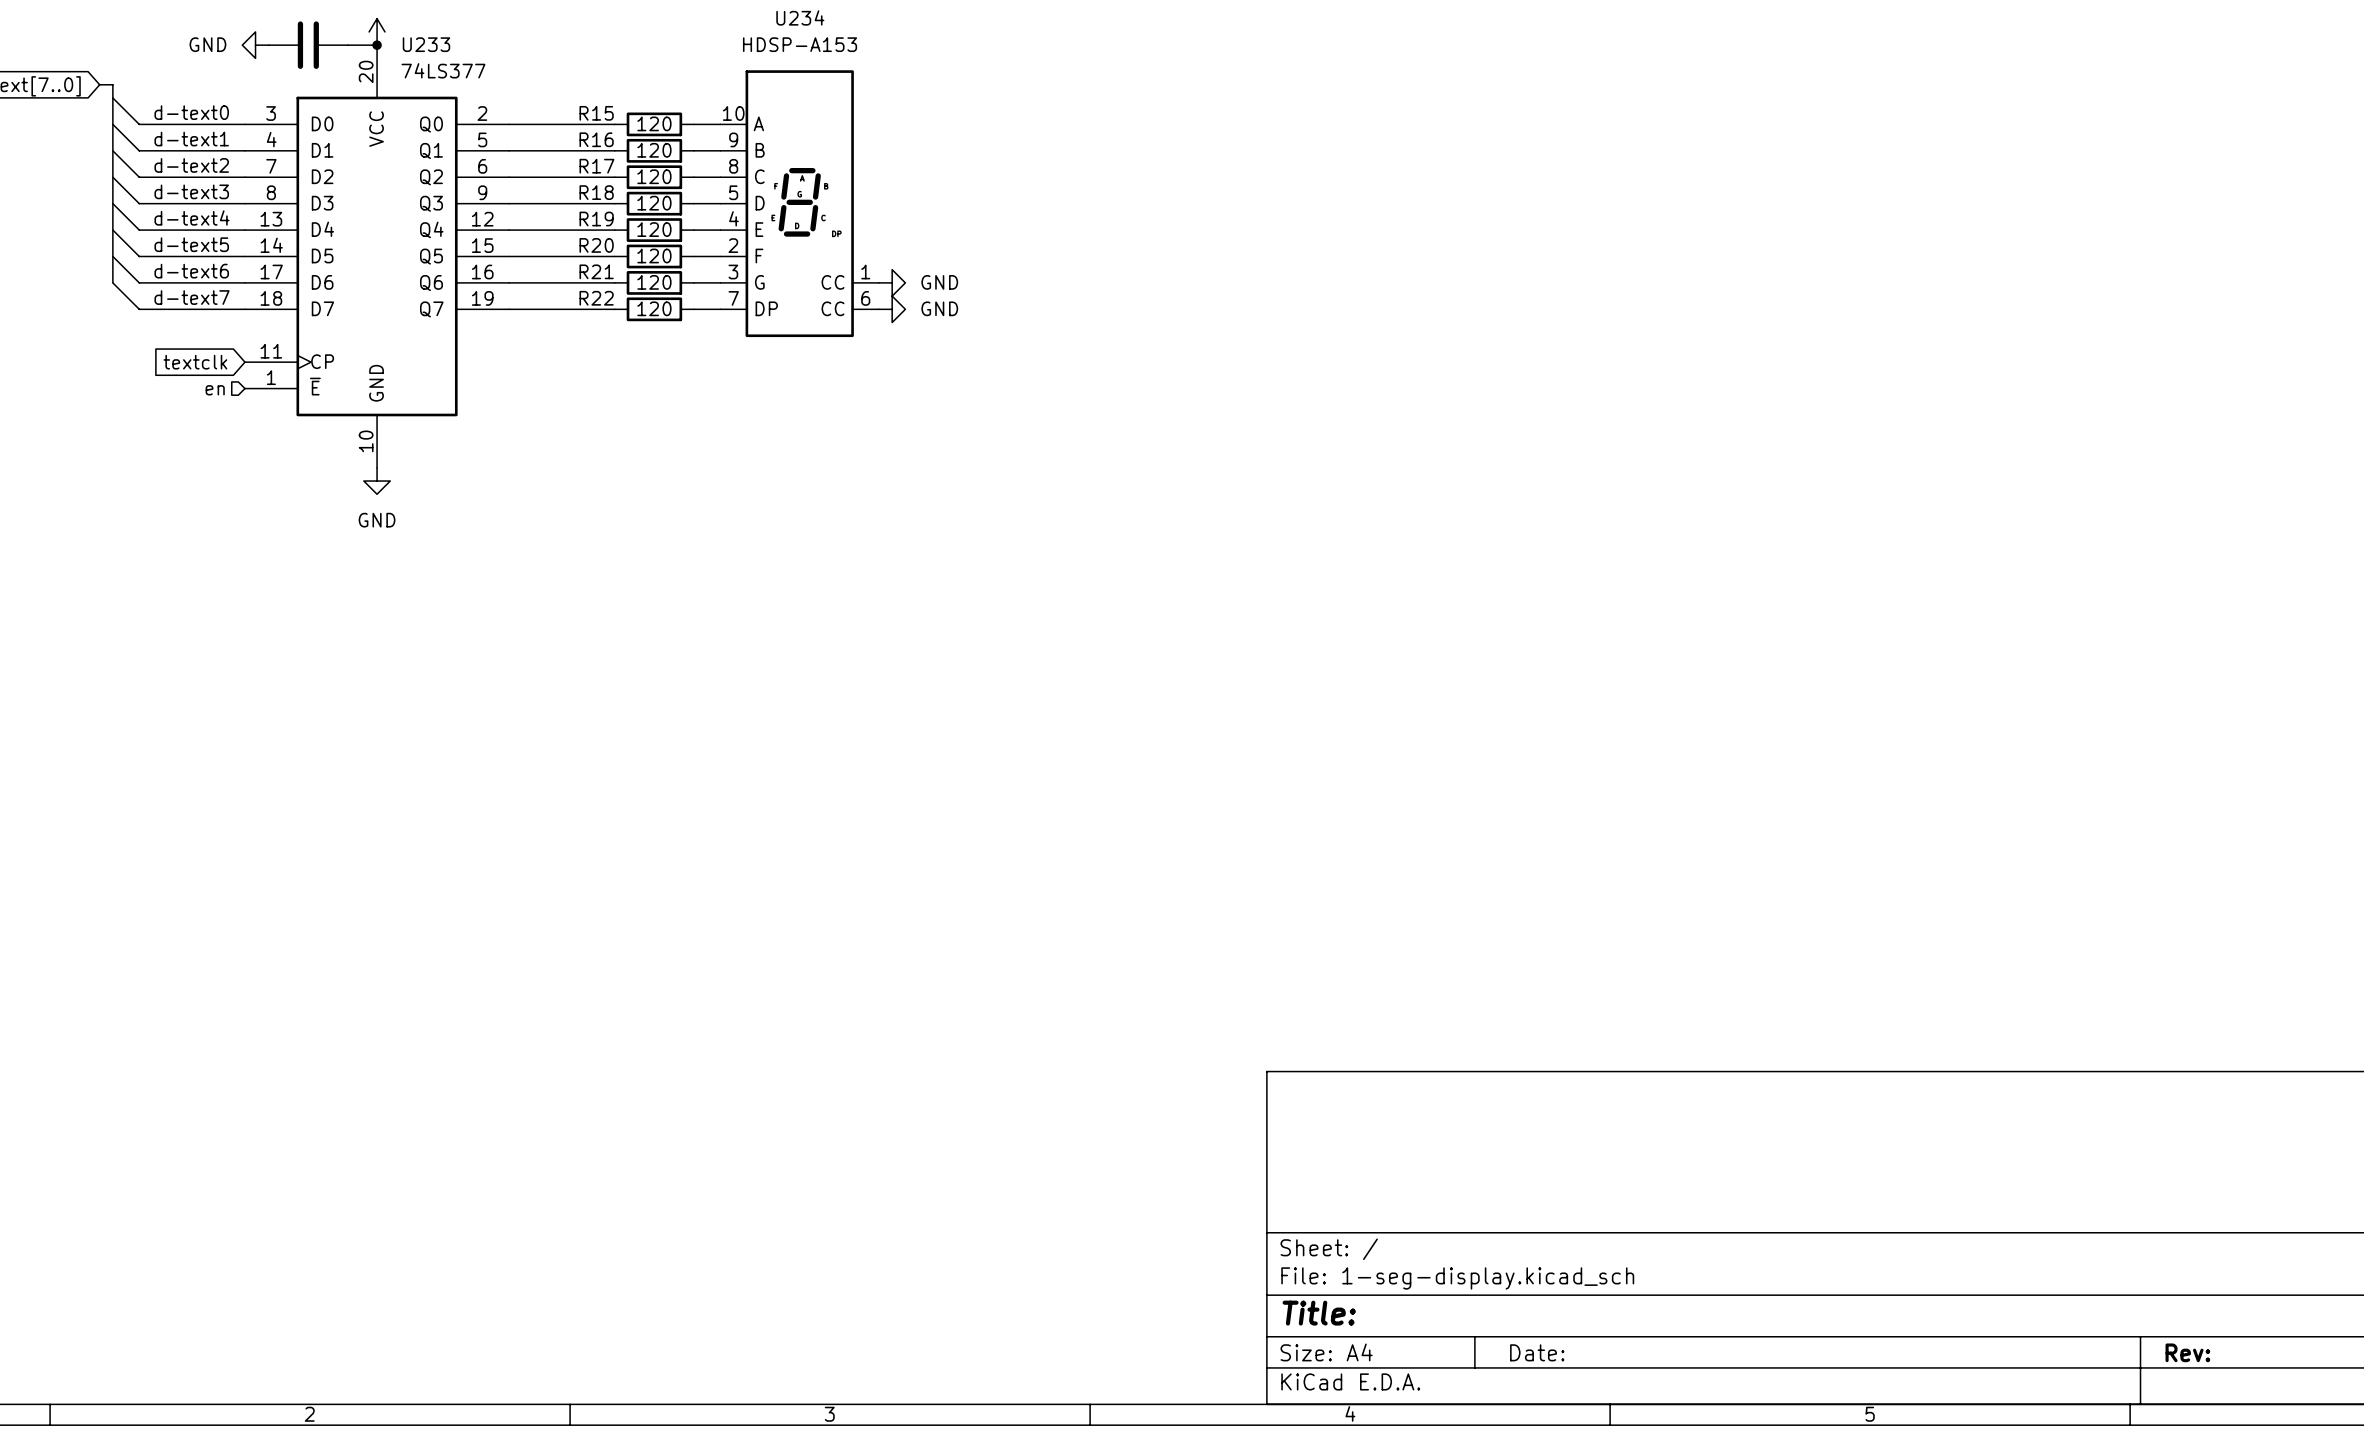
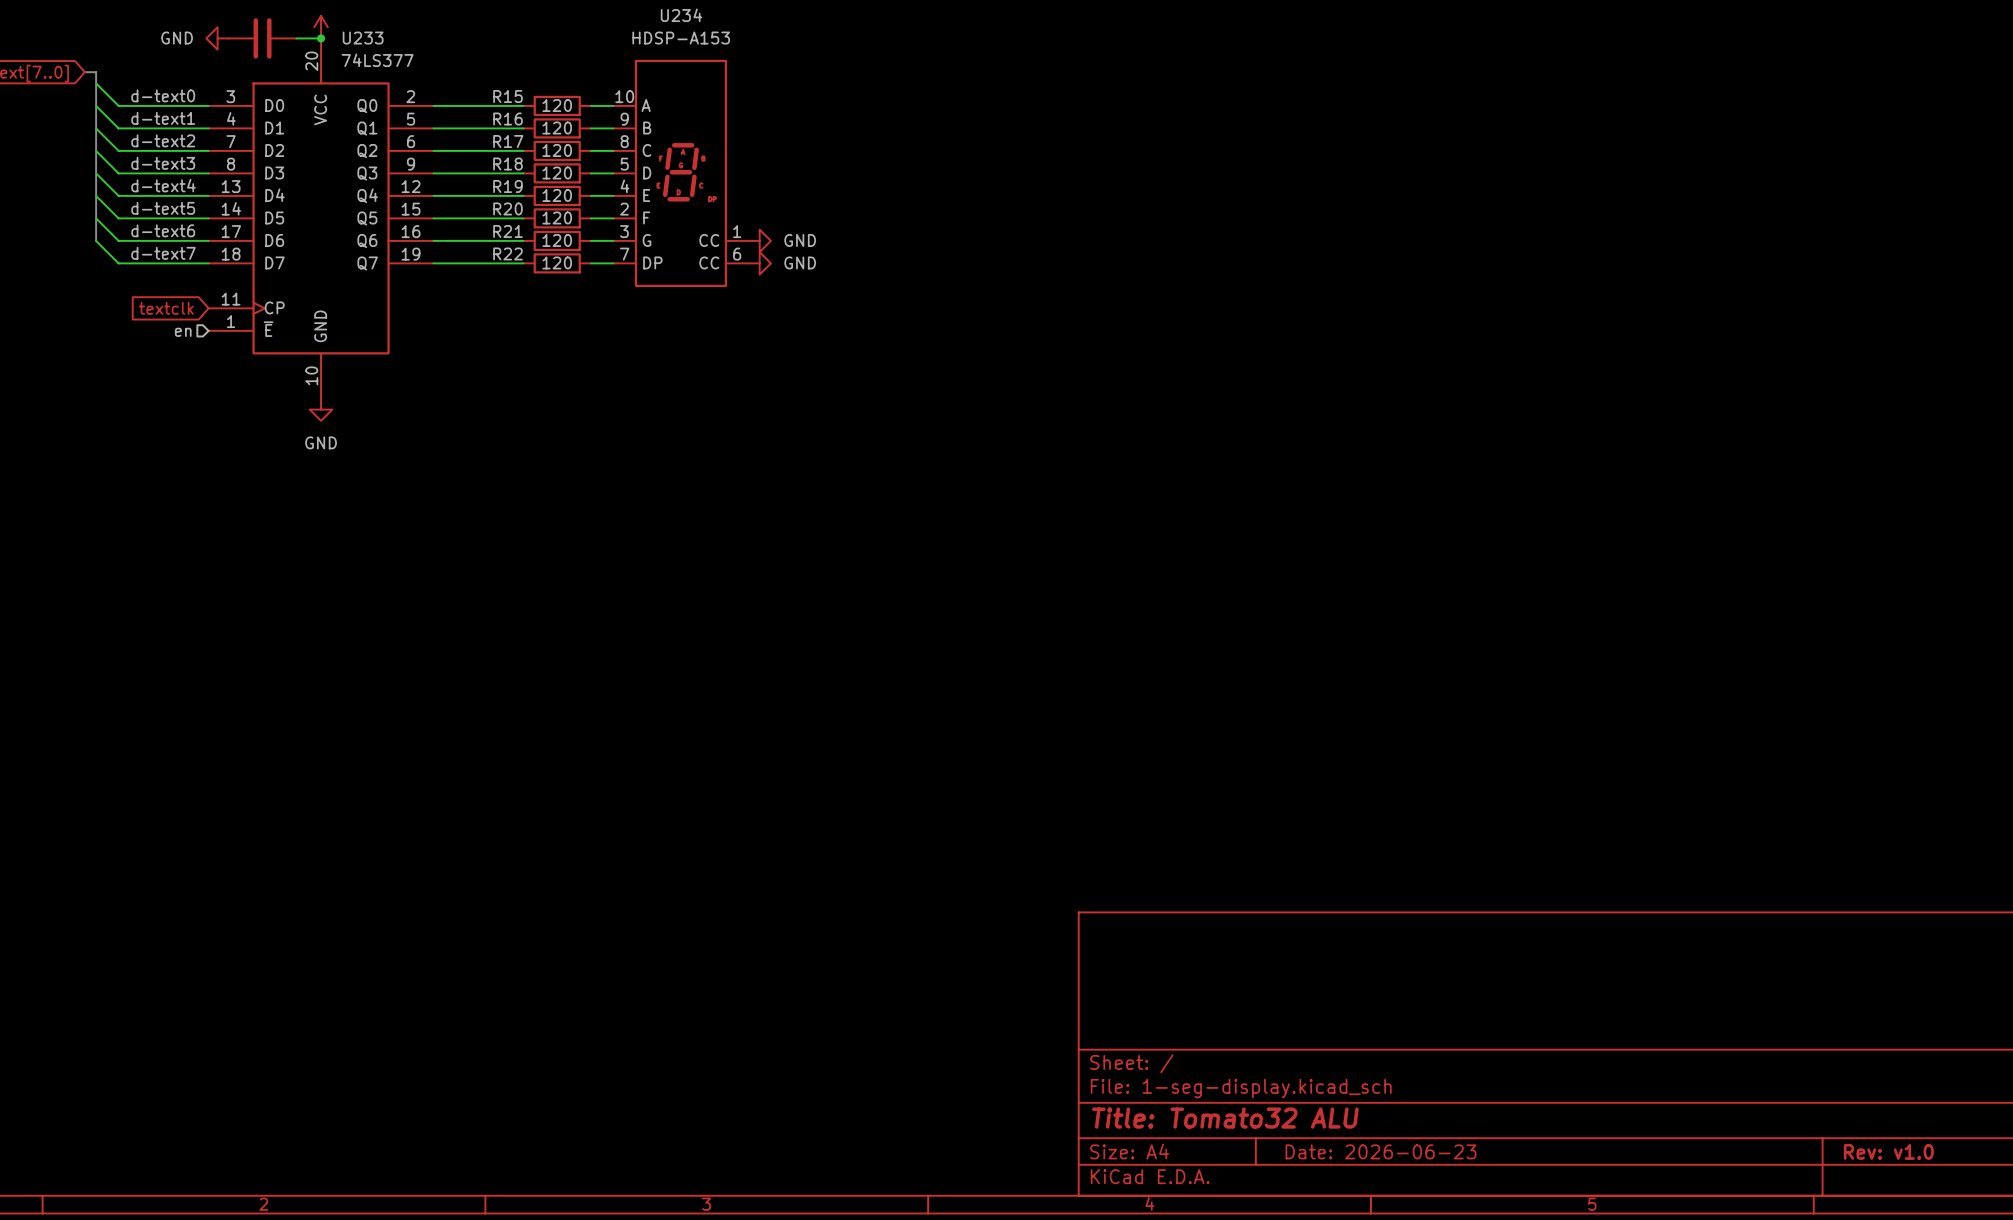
title block: Title: (1319, 1313) -> Title: Tomato32 ALU (1225, 1118)
title block: Date: (1537, 1352) -> Date: 2026-06-23 (1381, 1151)
title block: Rev: (2187, 1352) -> Rev: v1.0 (1888, 1151)

